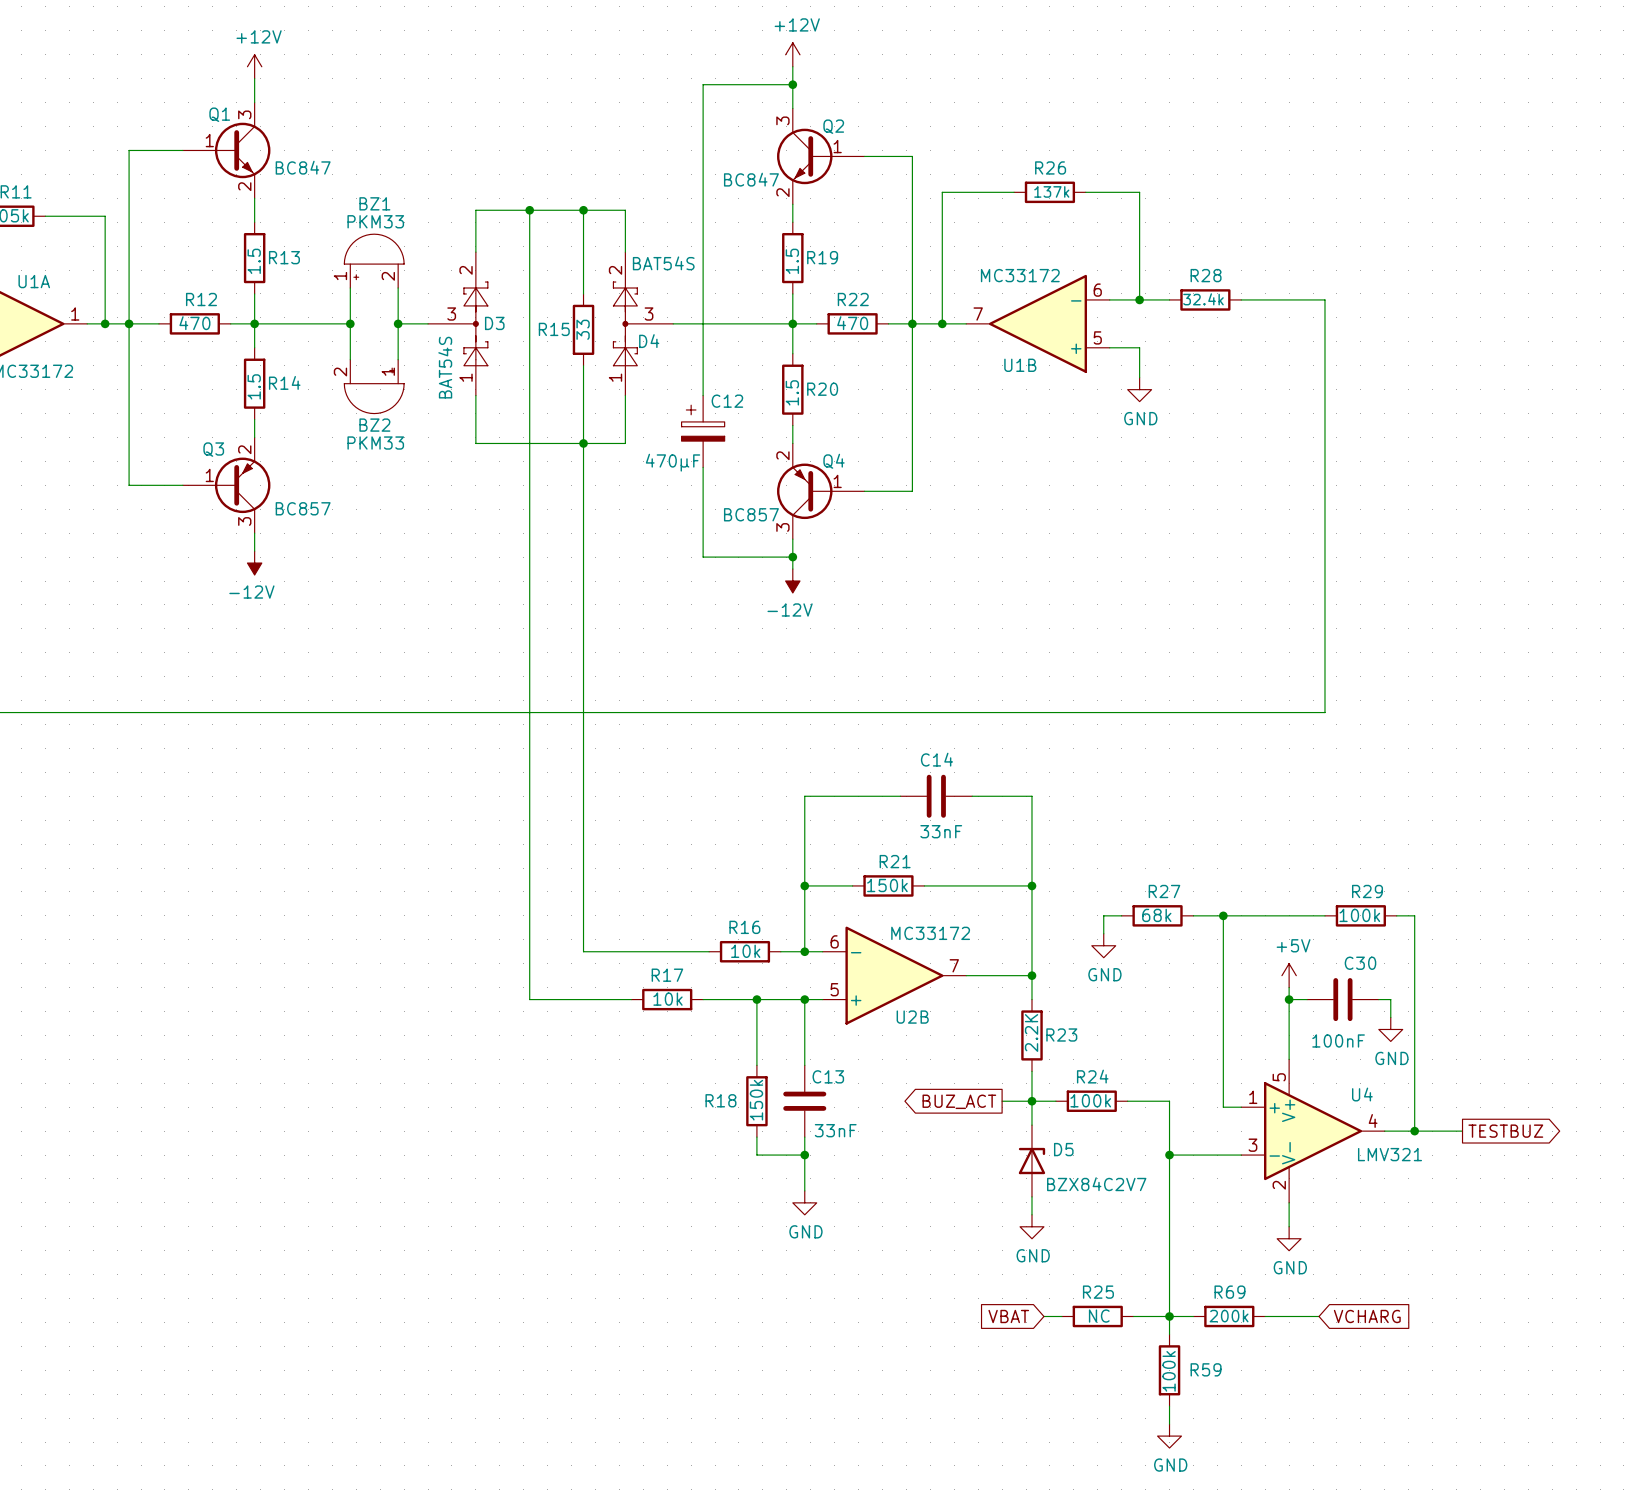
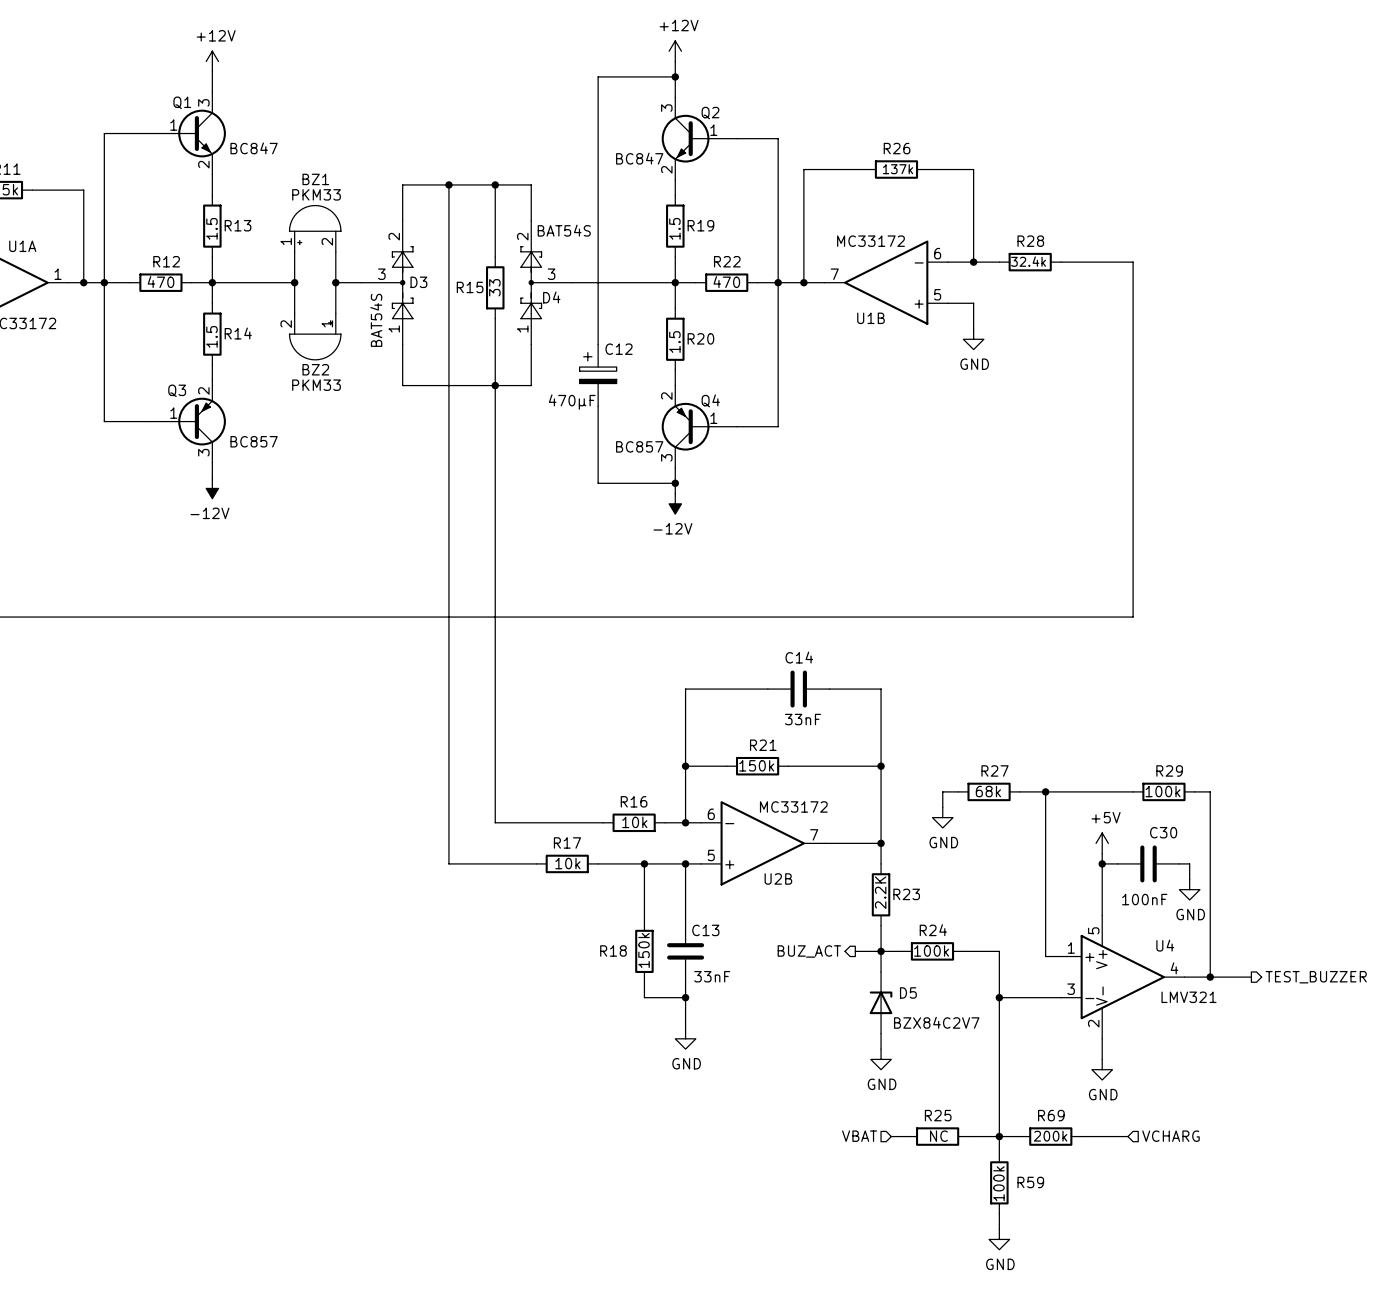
hierarchical label: none -> BUZ_ACT (809, 951)
global label: BUZ_ACT (959, 1101) -> none
global label: TESTBUZ (1505, 1131) -> none
hierarchical label: none -> TEST_BUZZER (1316, 977)
hierarchical label: none -> VBAT (859, 1136)
global label: VBAT (1008, 1316) -> none
global label: VCHARG (1367, 1316) -> none
hierarchical label: none -> VCHARG (1170, 1136)

